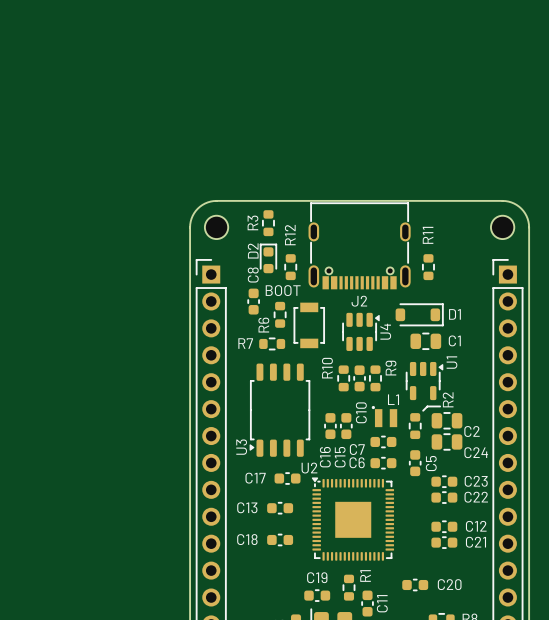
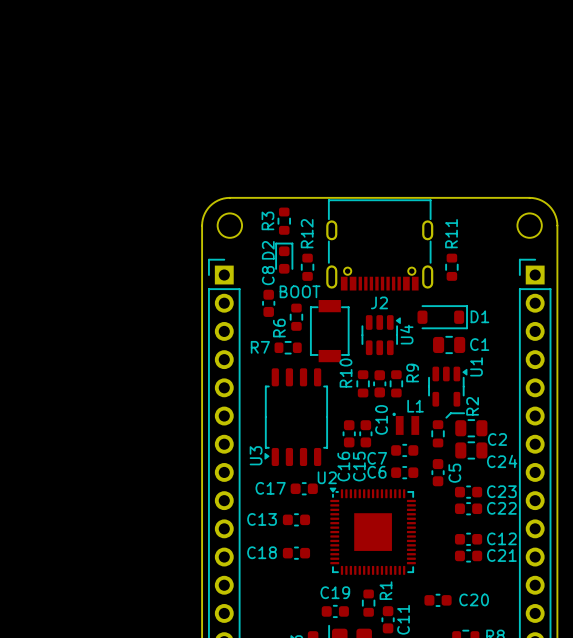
BOOT footprint: [293, 302, 325, 349] -> [310, 300, 350, 363]

